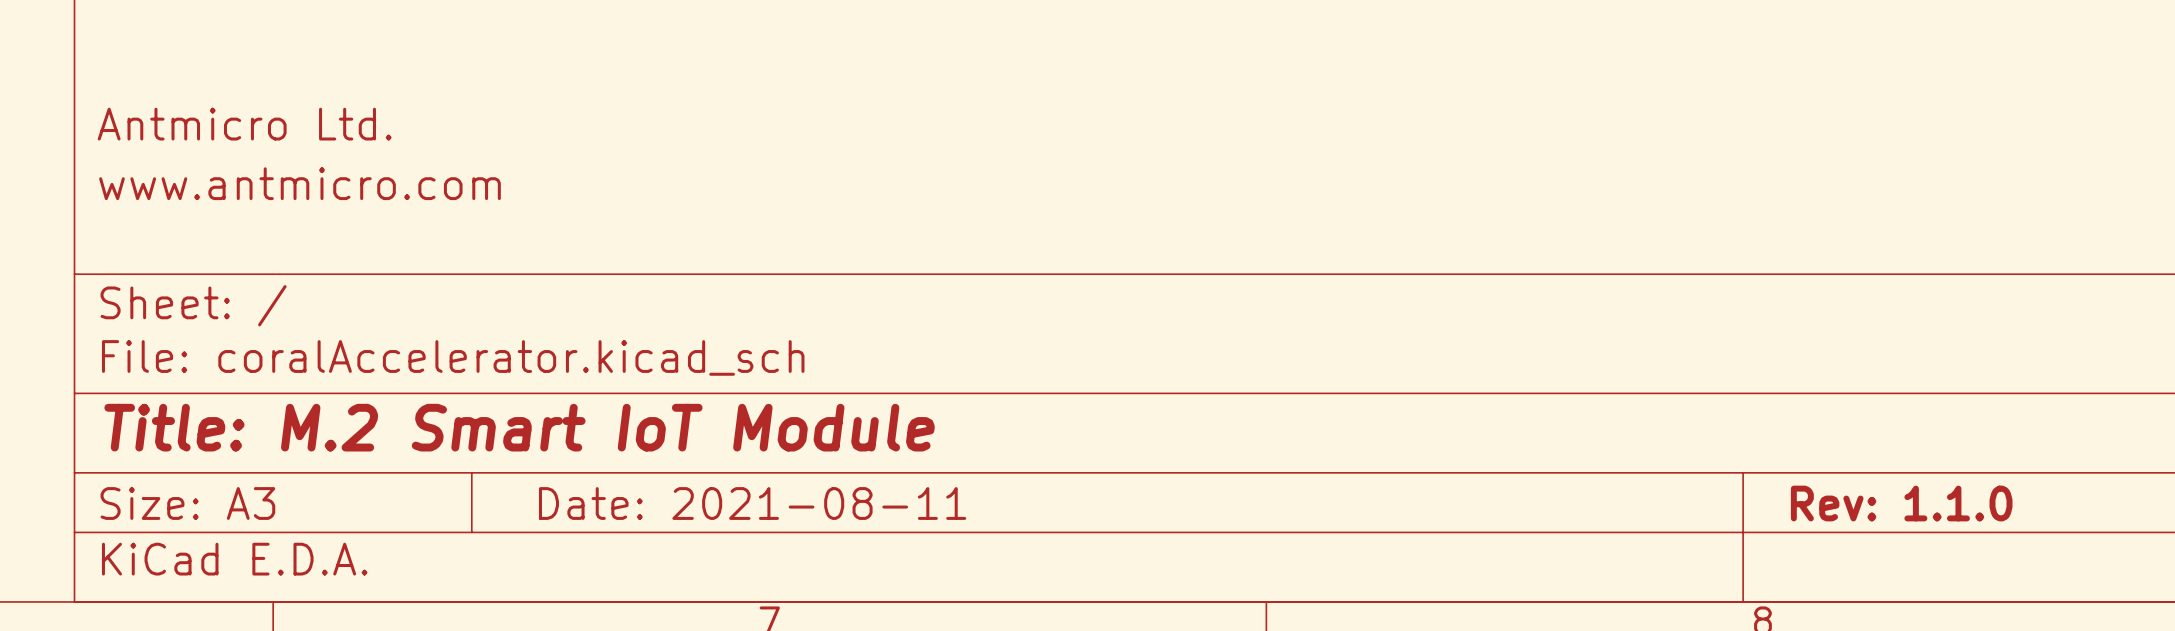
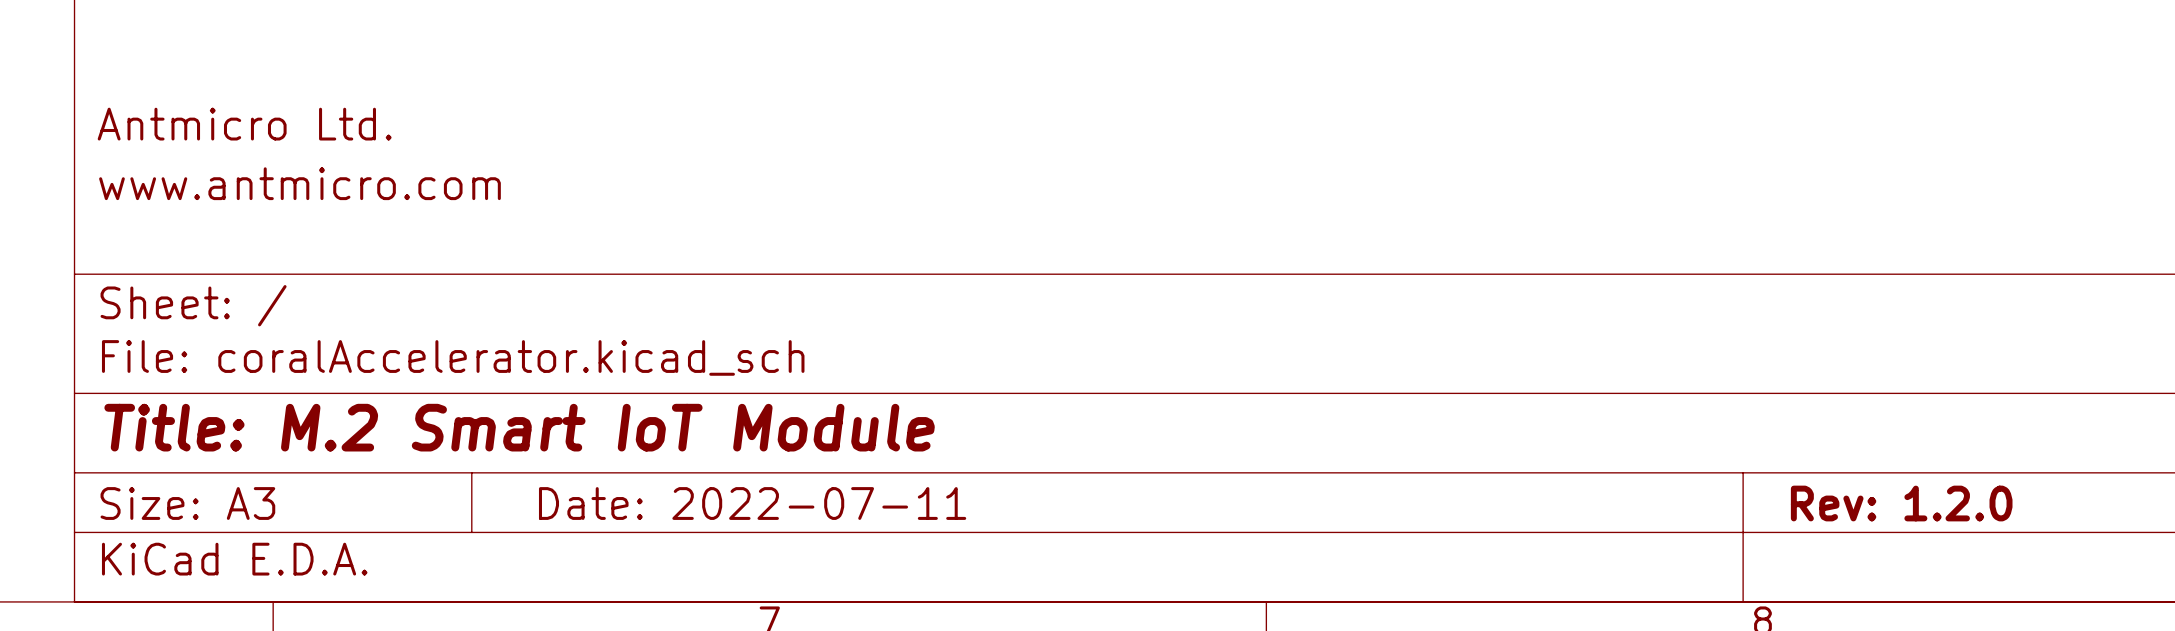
title block: Date: 2021-08-11 (752, 503) -> Date: 2022-07-11 (752, 503)
title block: Rev: 1.1.0 (1901, 503) -> Rev: 1.2.0 (1901, 503)

